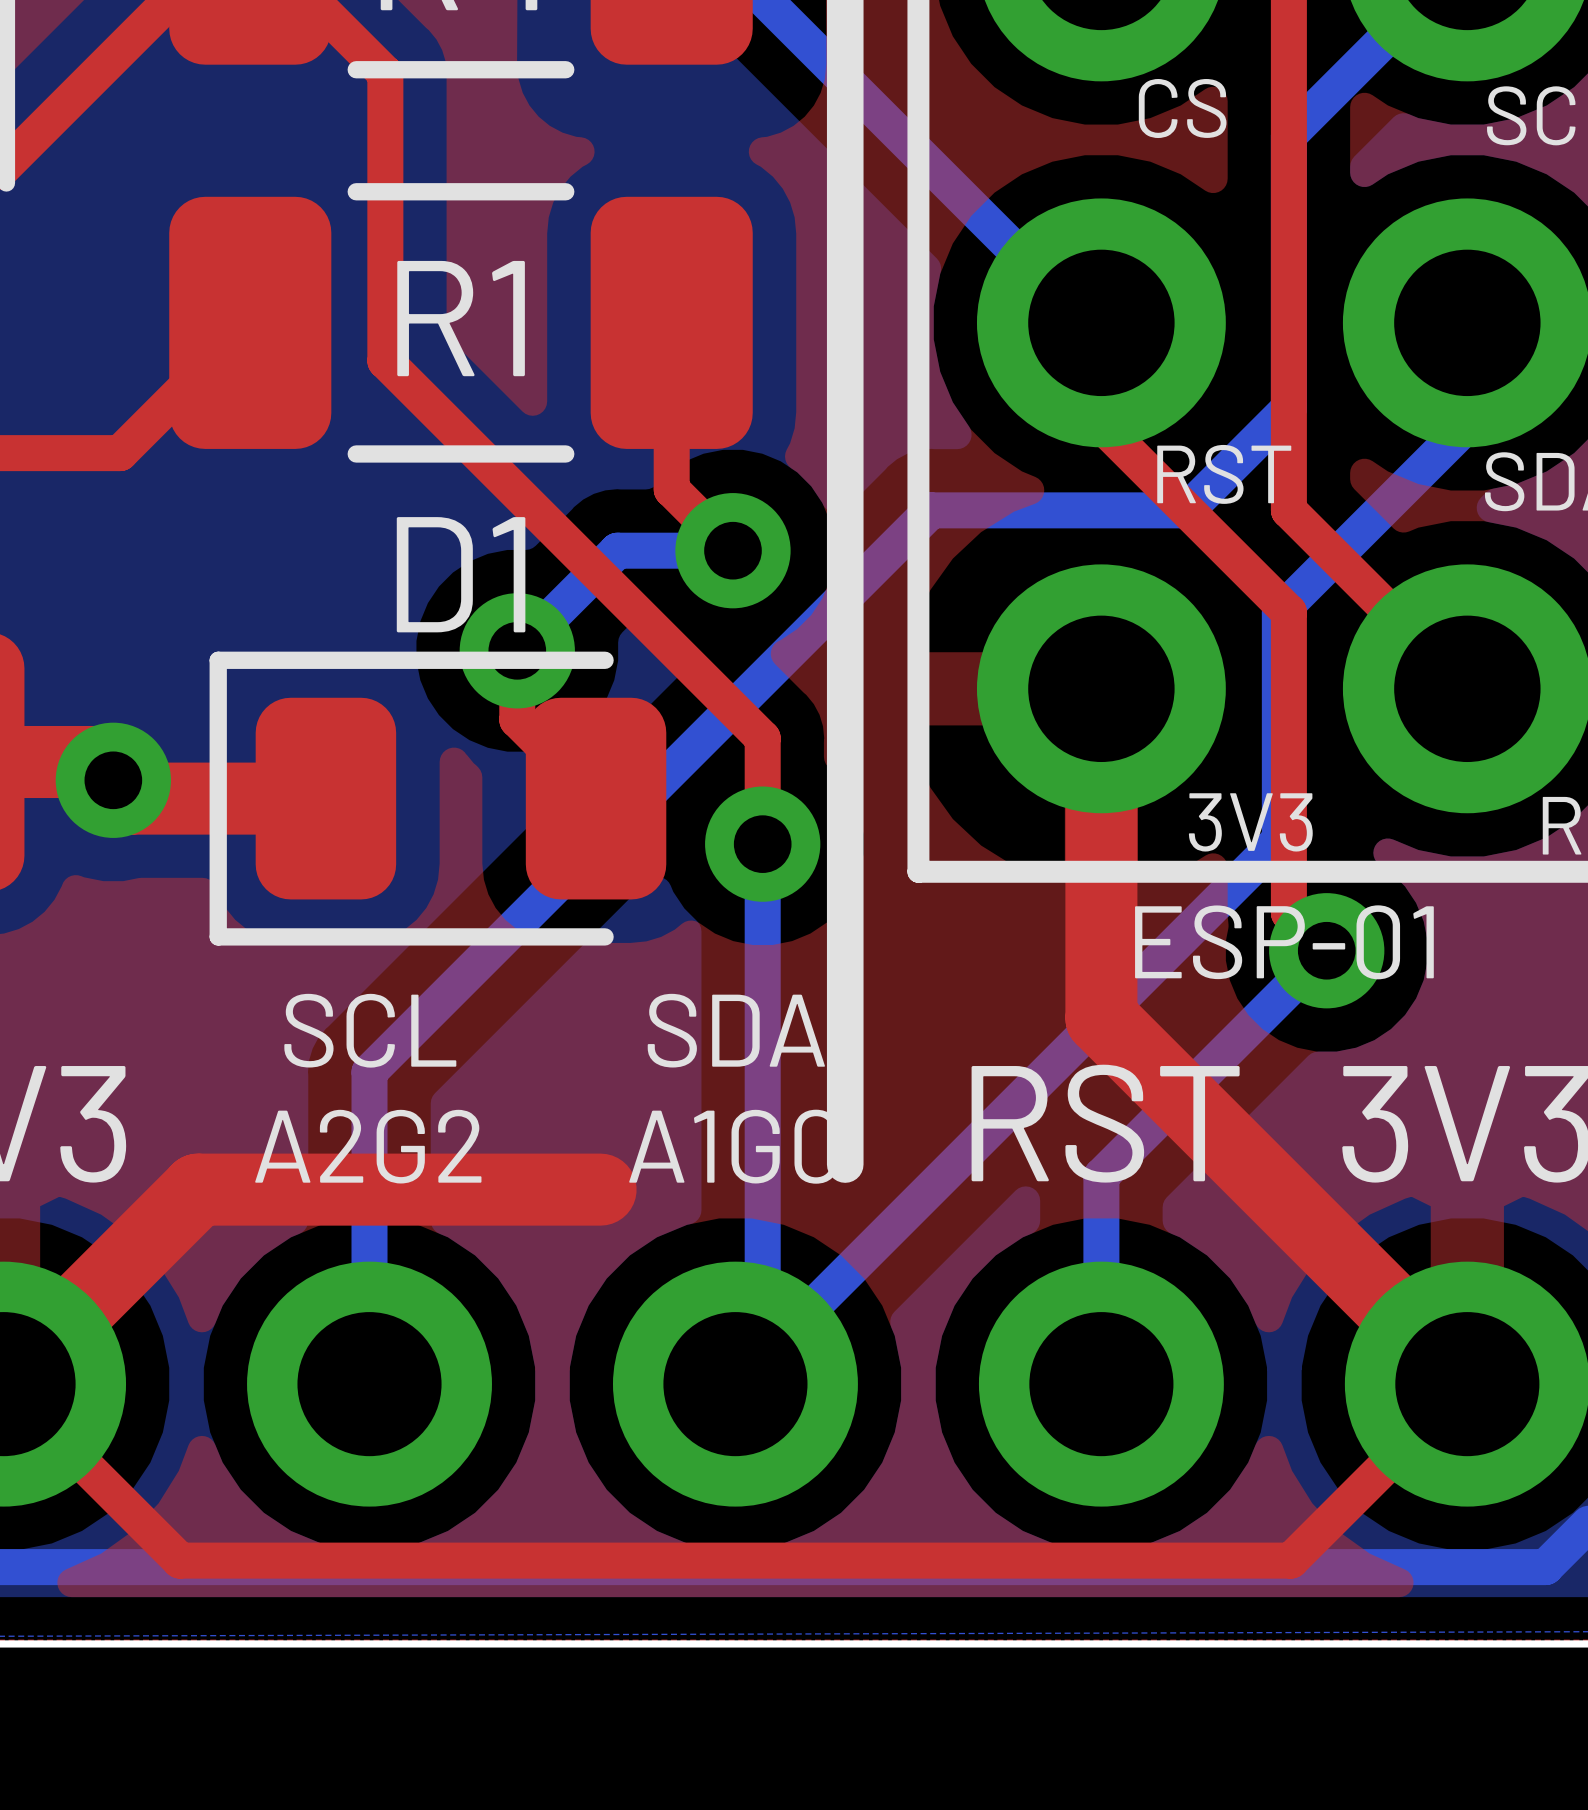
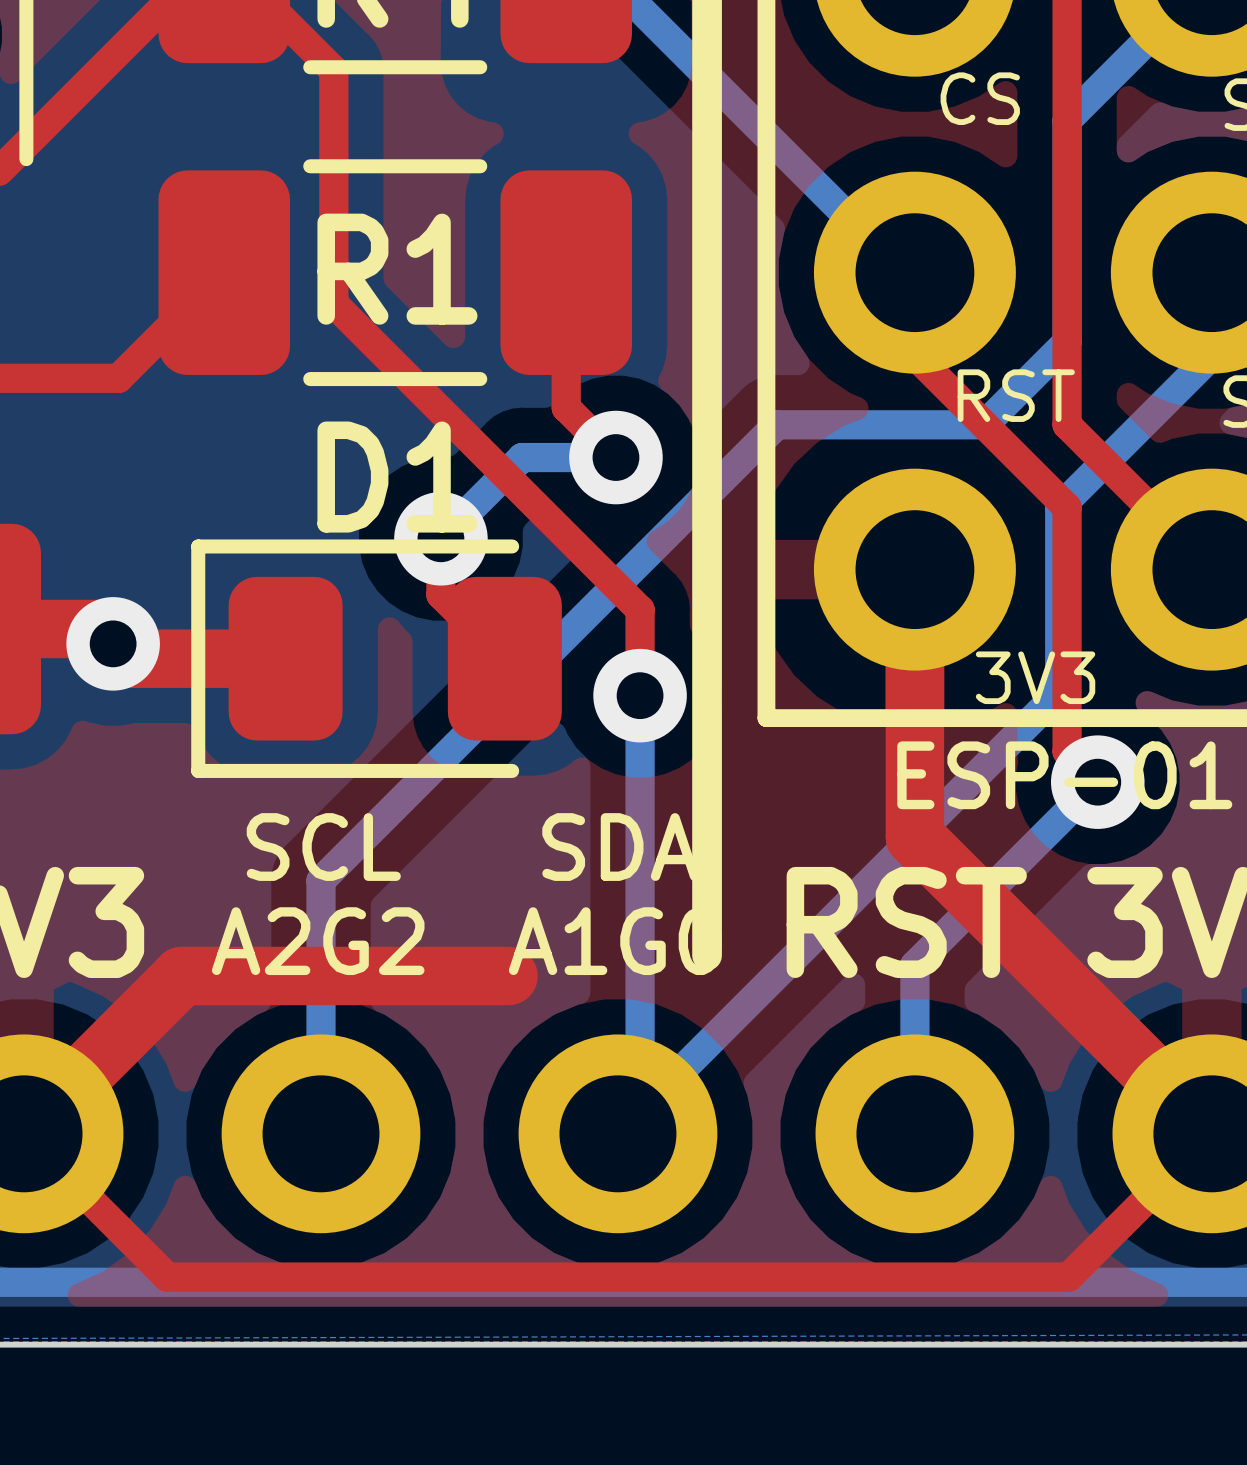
text position: RST (1105, 1123) -> RST (906, 922)

